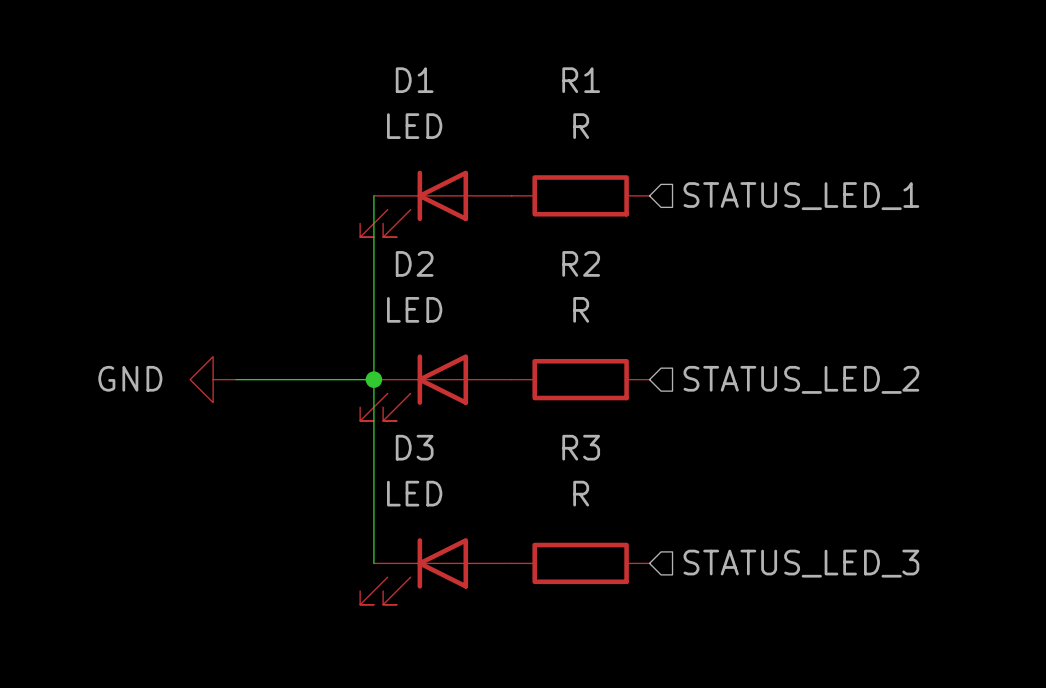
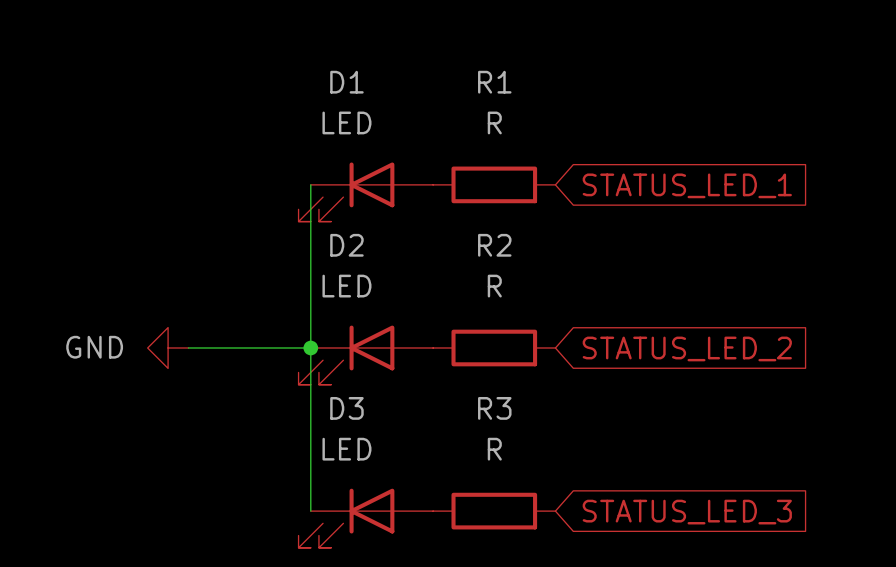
global label: none -> STATUS_LED_1 (687, 185)
hierarchical label: STATUS_LED_1 (801, 196) -> none
hierarchical label: STATUS_LED_2 (801, 379) -> none
global label: none -> STATUS_LED_2 (687, 348)
hierarchical label: STATUS_LED_3 (801, 563) -> none
global label: none -> STATUS_LED_3 (687, 512)

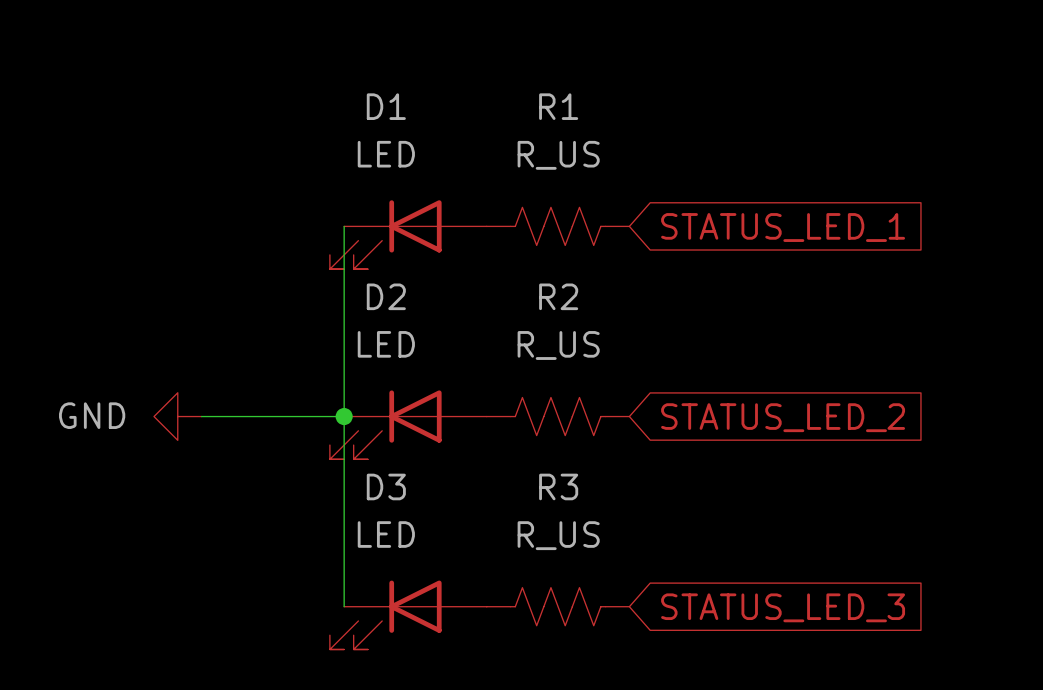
R1 value: R (494, 122) -> R_US (558, 155)
R1 symbol: [433, 166, 556, 204] -> [486, 207, 630, 246]
R2 value: R (494, 286) -> R_US (558, 345)
R2 symbol: [433, 329, 556, 367] -> [486, 397, 630, 436]
R3 value: R (494, 449) -> R_US (558, 535)
R3 symbol: [433, 492, 556, 530] -> [486, 587, 630, 626]

